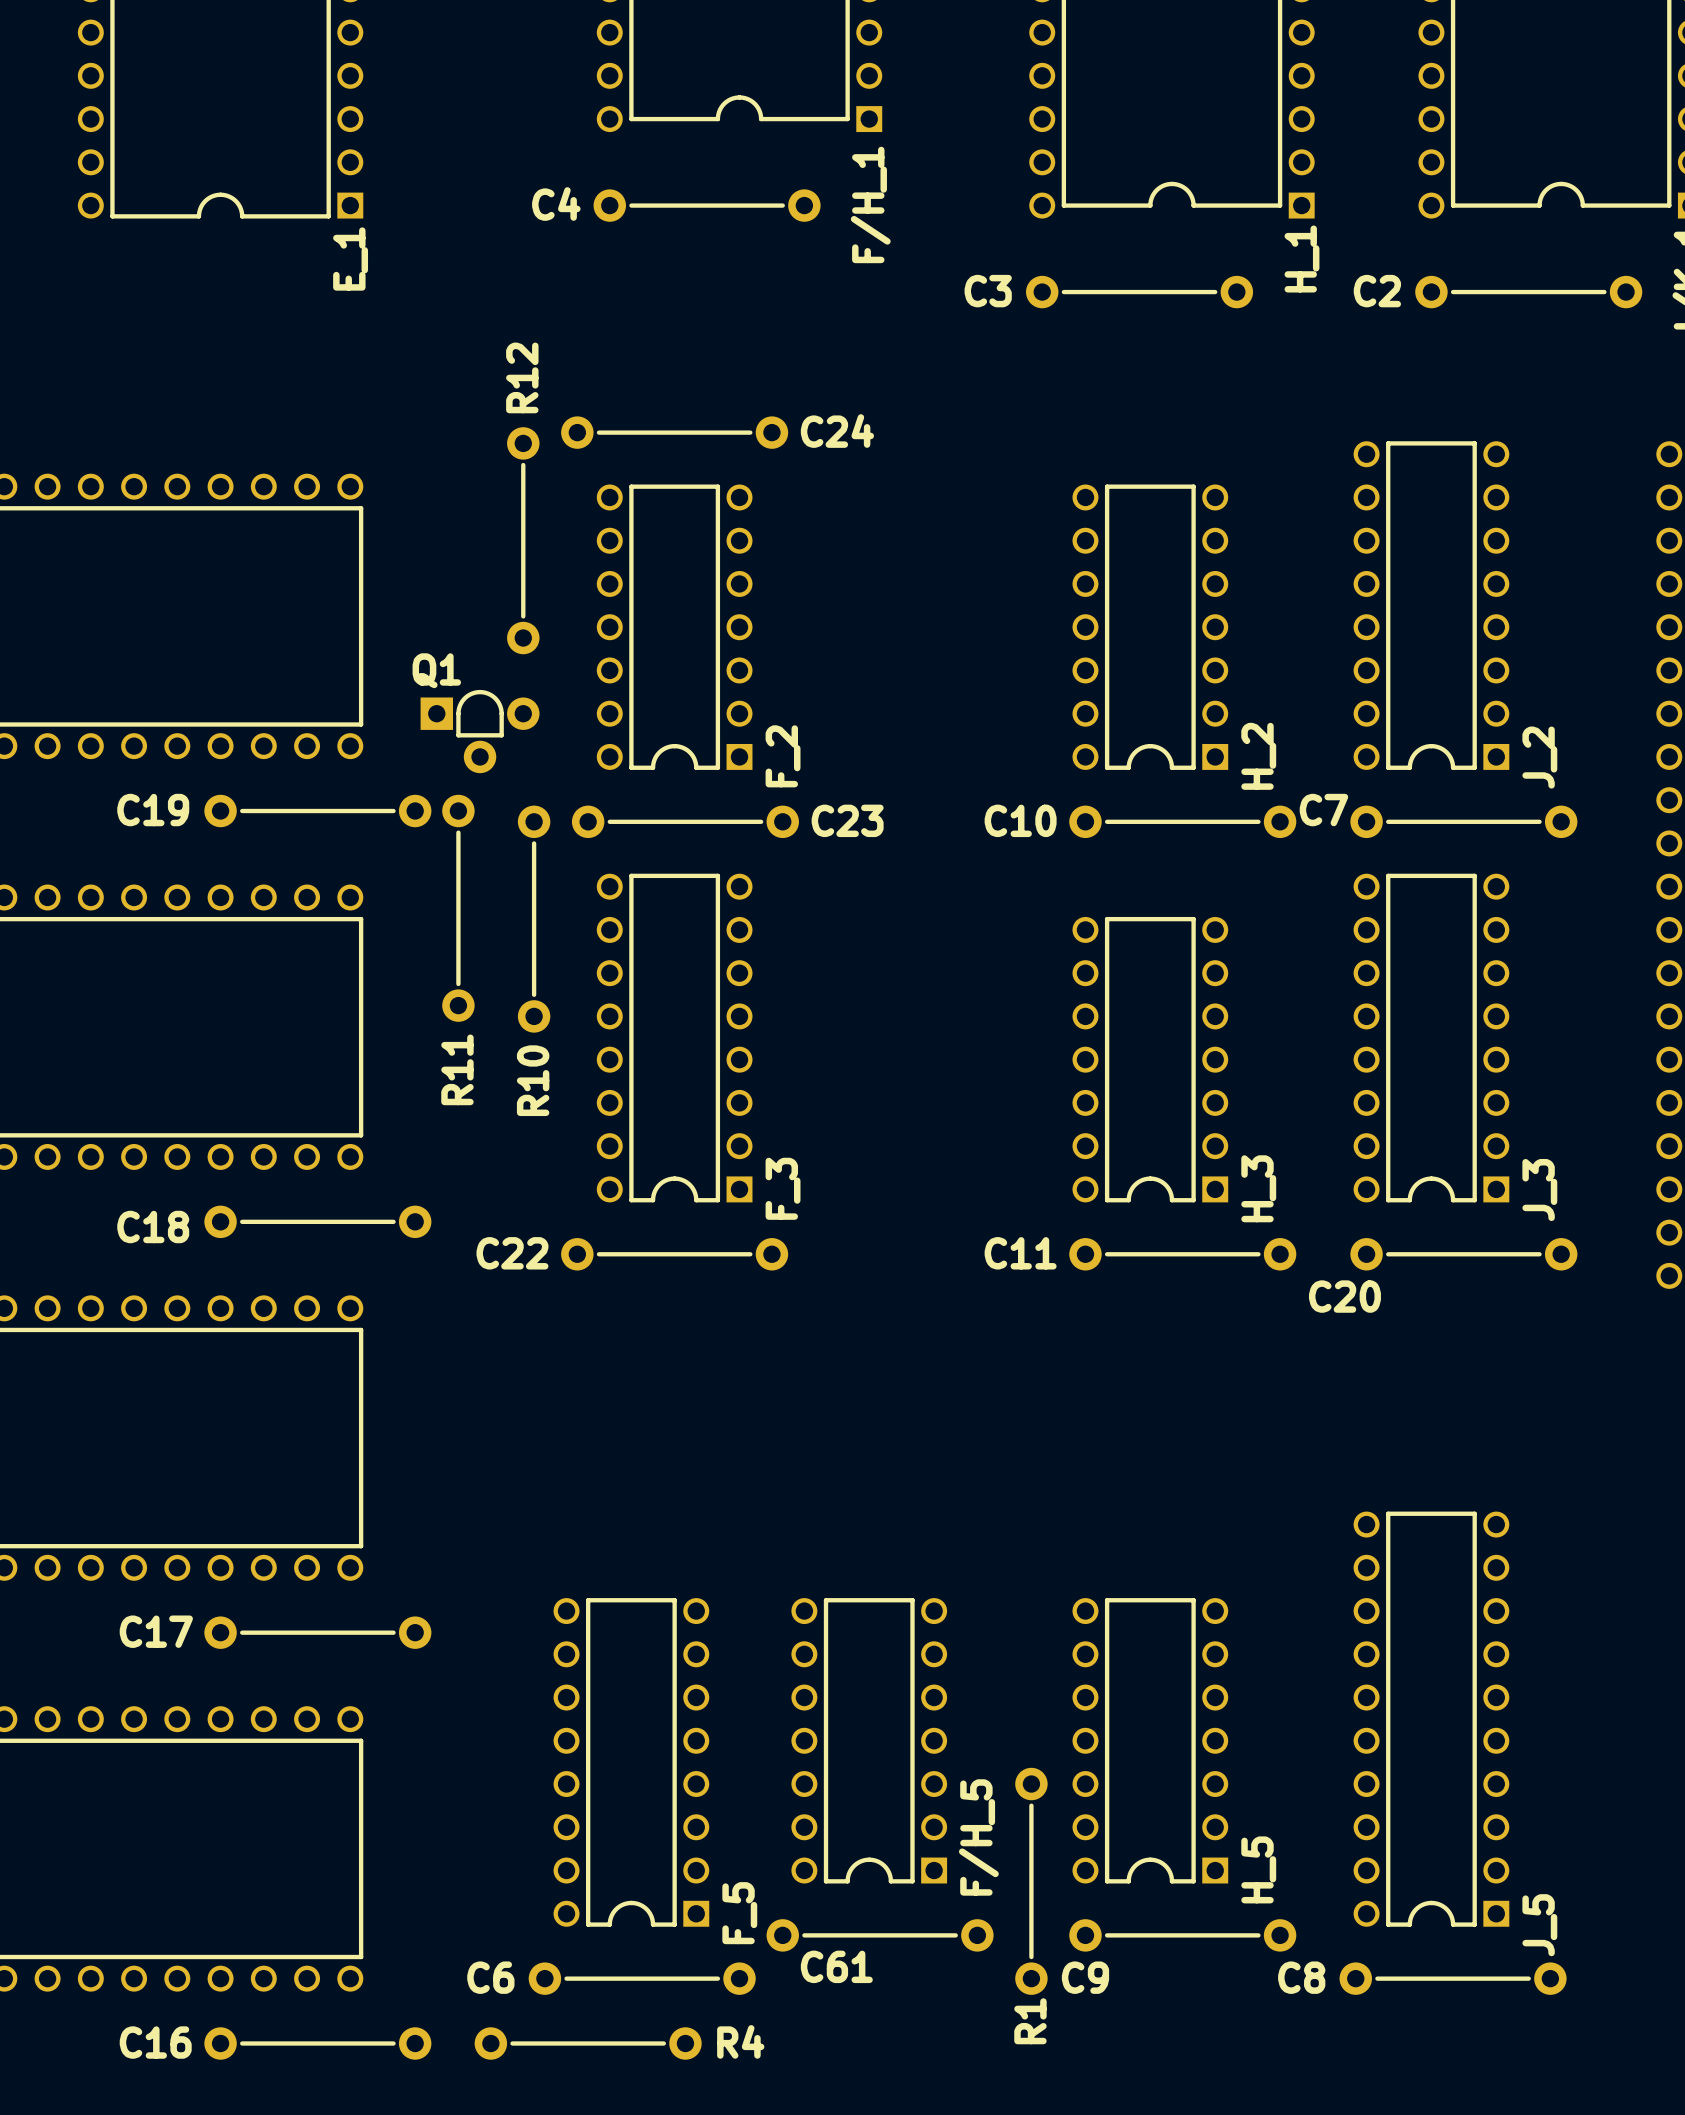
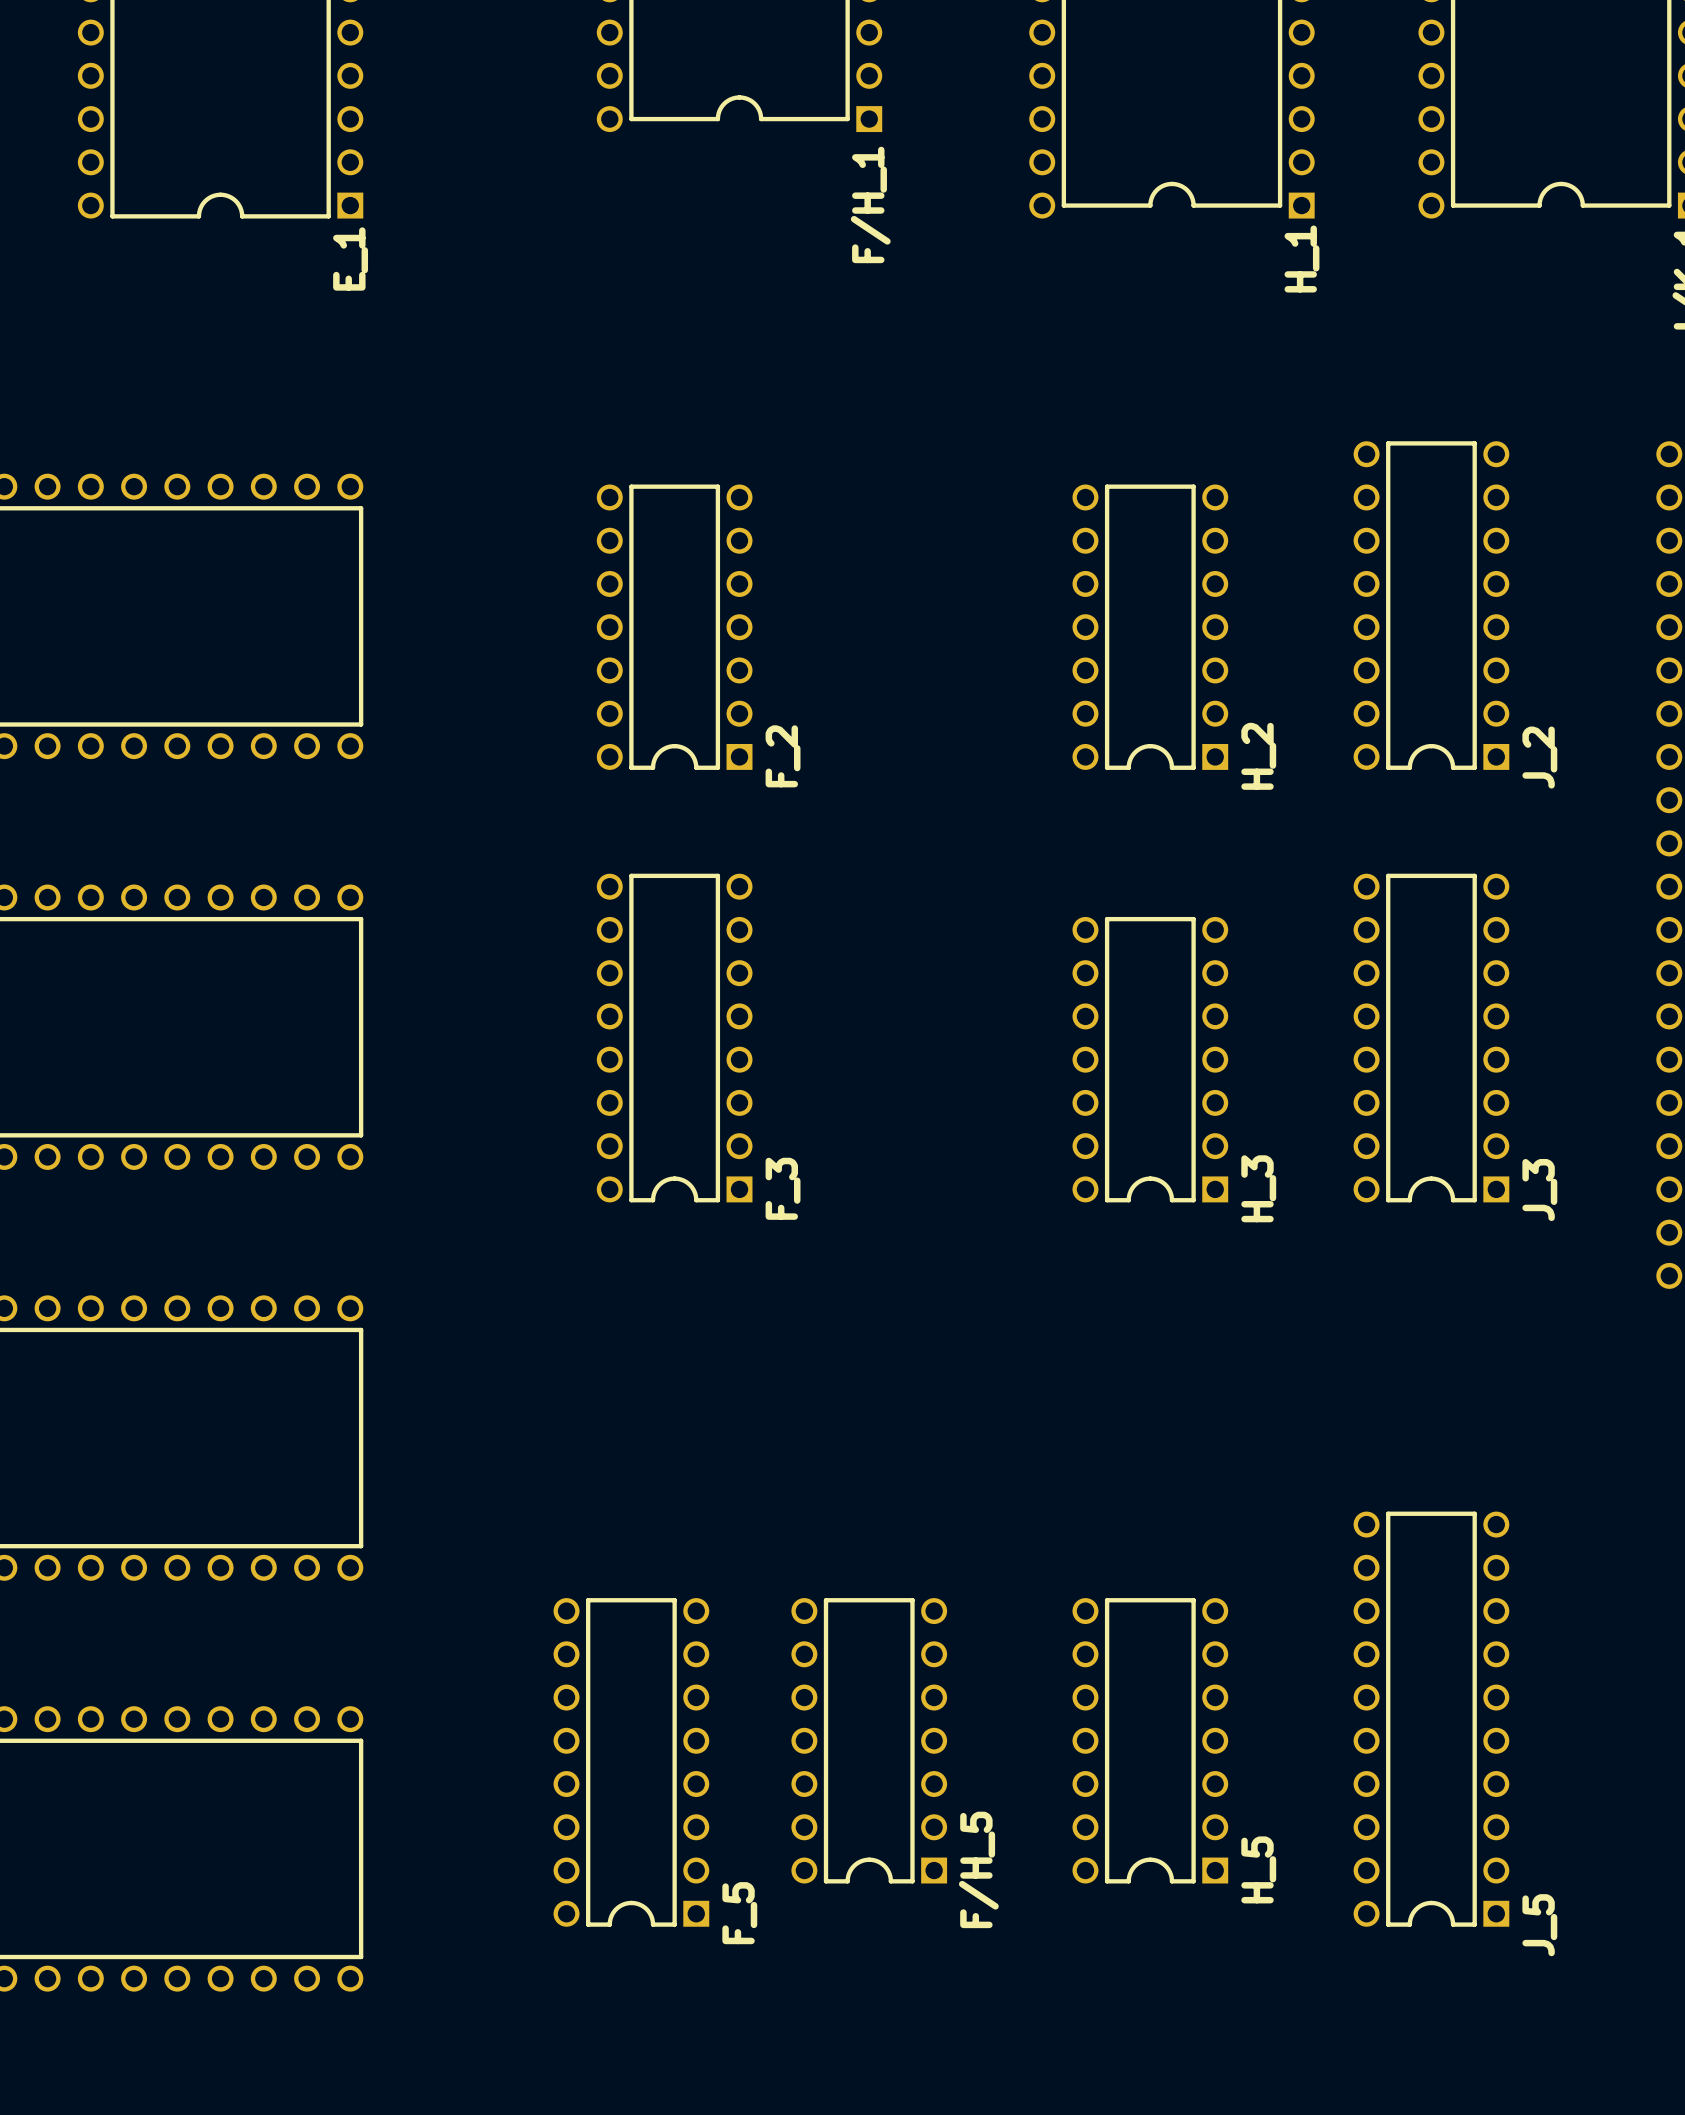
C4: (707, 205) -> none
C3: (1139, 292) -> none
C2: (1528, 292) -> none
C24: (674, 432) -> none
R12: (523, 540) -> none
Q1: (480, 731) -> none
C19: (317, 811) -> none
C23: (685, 821) -> none
C10: (1182, 821) -> none
C7: (1463, 821) -> none
R11: (458, 908) -> none
R10: (534, 919) -> none
C18: (317, 1221) -> none
C22: (674, 1254) -> none
C11: (1182, 1254) -> none
C20: (1463, 1254) -> none
C17: (317, 1632) -> none
F/H_5 name position: F/H_5 (978, 1837) -> F/H_5 (978, 1869)
R1: (1031, 1881) -> none
C61: (880, 1935) -> none
C9: (1182, 1935) -> none
C6: (642, 1978) -> none
C8: (1453, 1978) -> none
C16: (317, 2043) -> none
R4: (588, 2043) -> none

